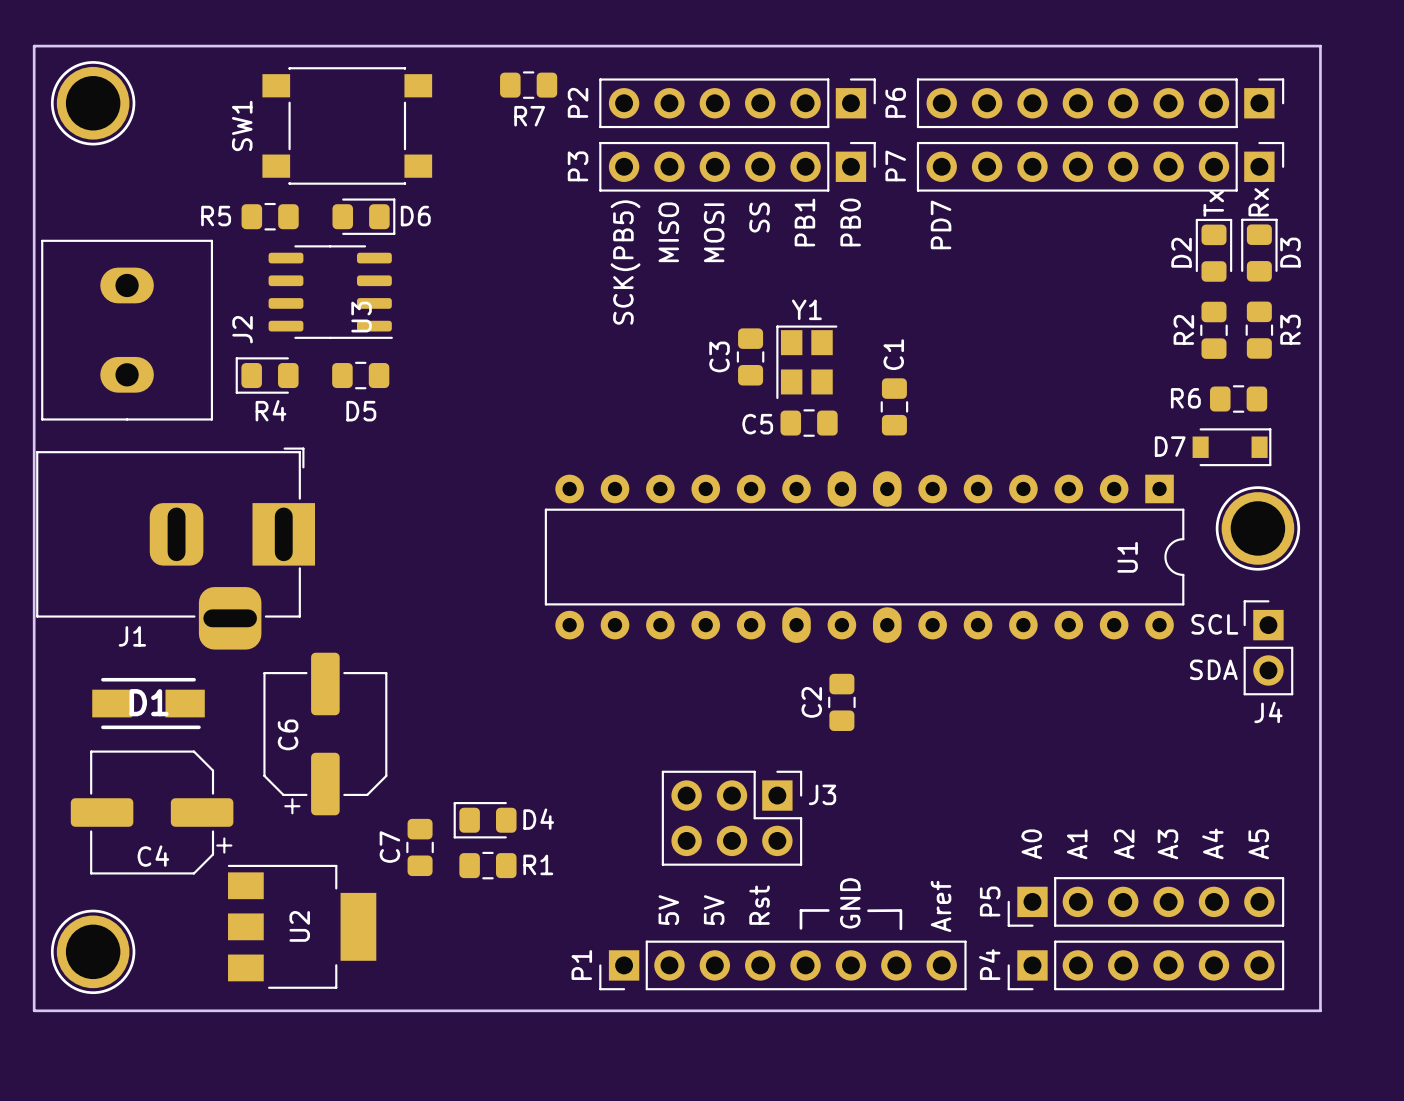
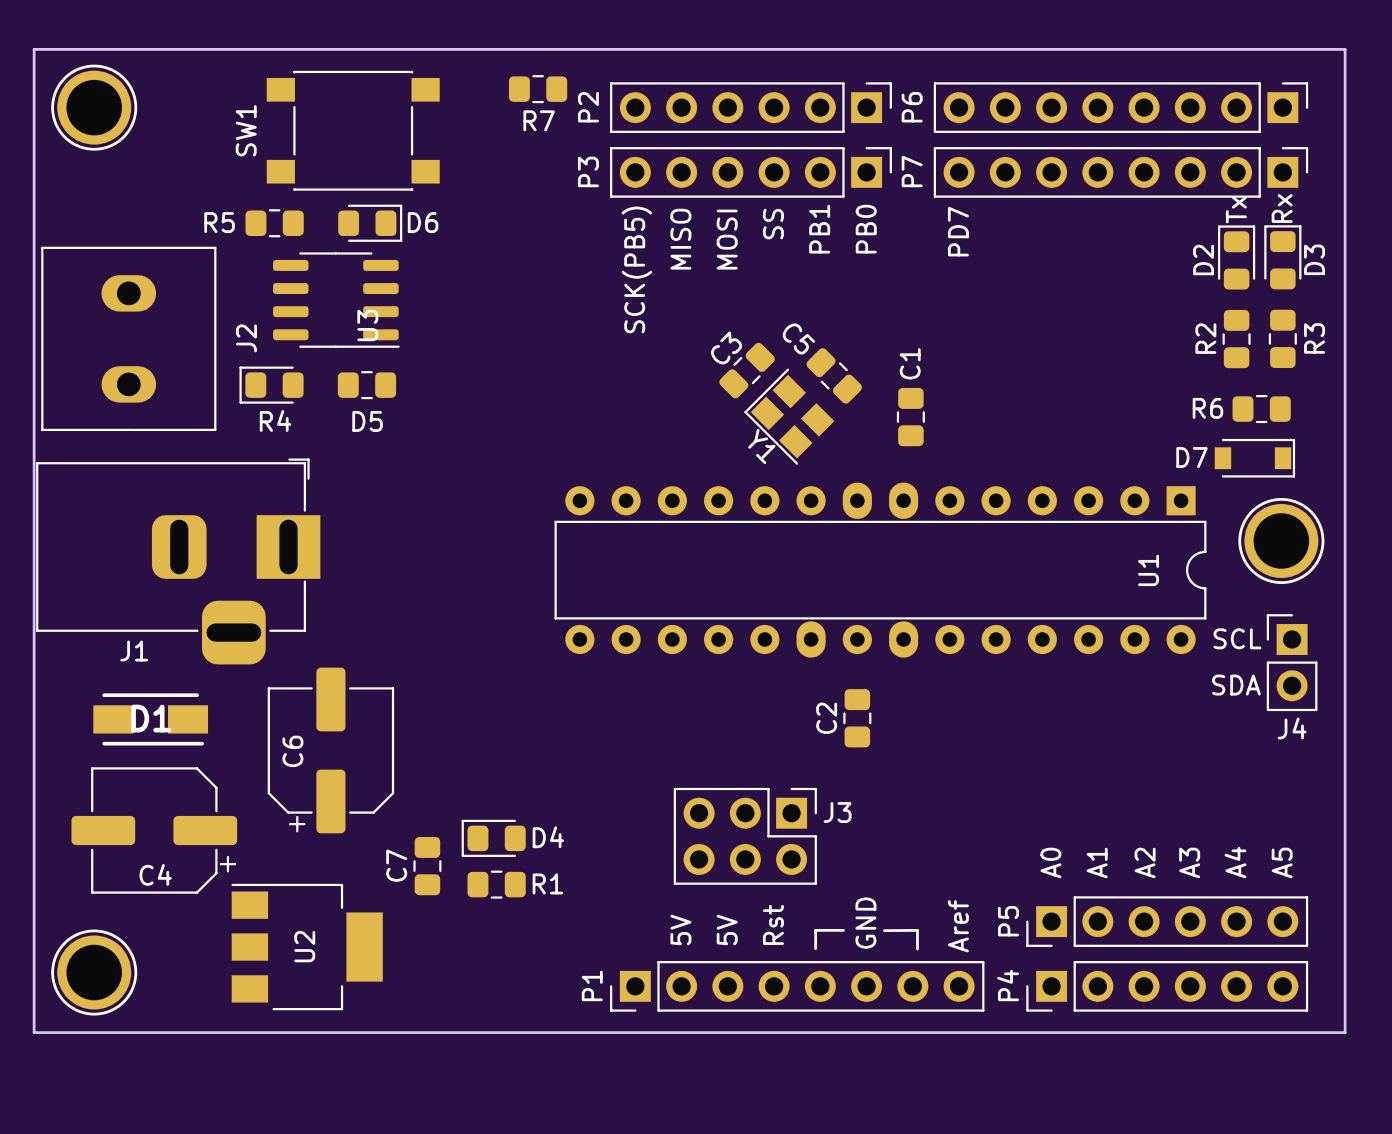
Y1 name position: Y1 (806, 309) -> Y1 (761, 446)
C3 rotation: 0° (750, 356) -> 45° clockwise (747, 370)
Y1 rotation: 0° (806, 362) -> 45° counterclockwise (789, 416)
Y1 position: (806, 362) -> (789, 416)
C5 rotation: 0° (809, 423) -> 45° clockwise (834, 375)
C5 position: (809, 423) -> (834, 375)

